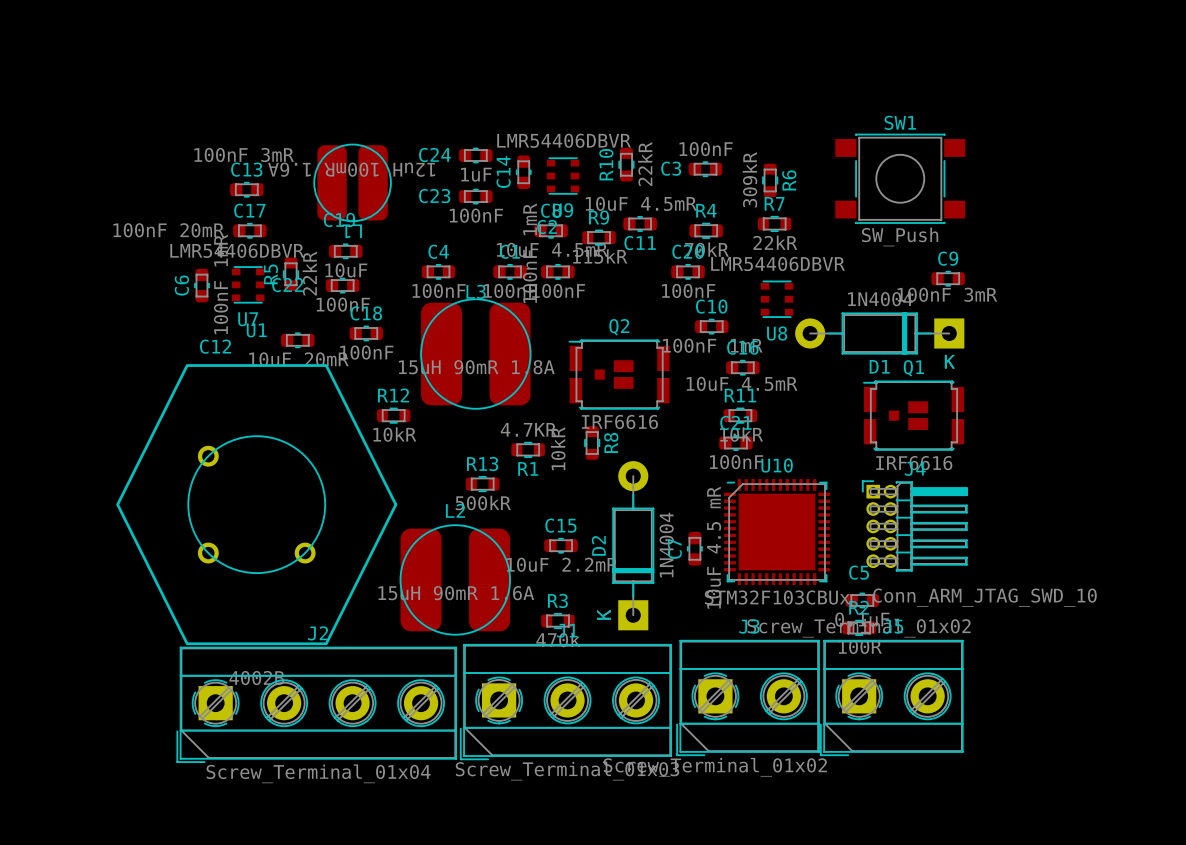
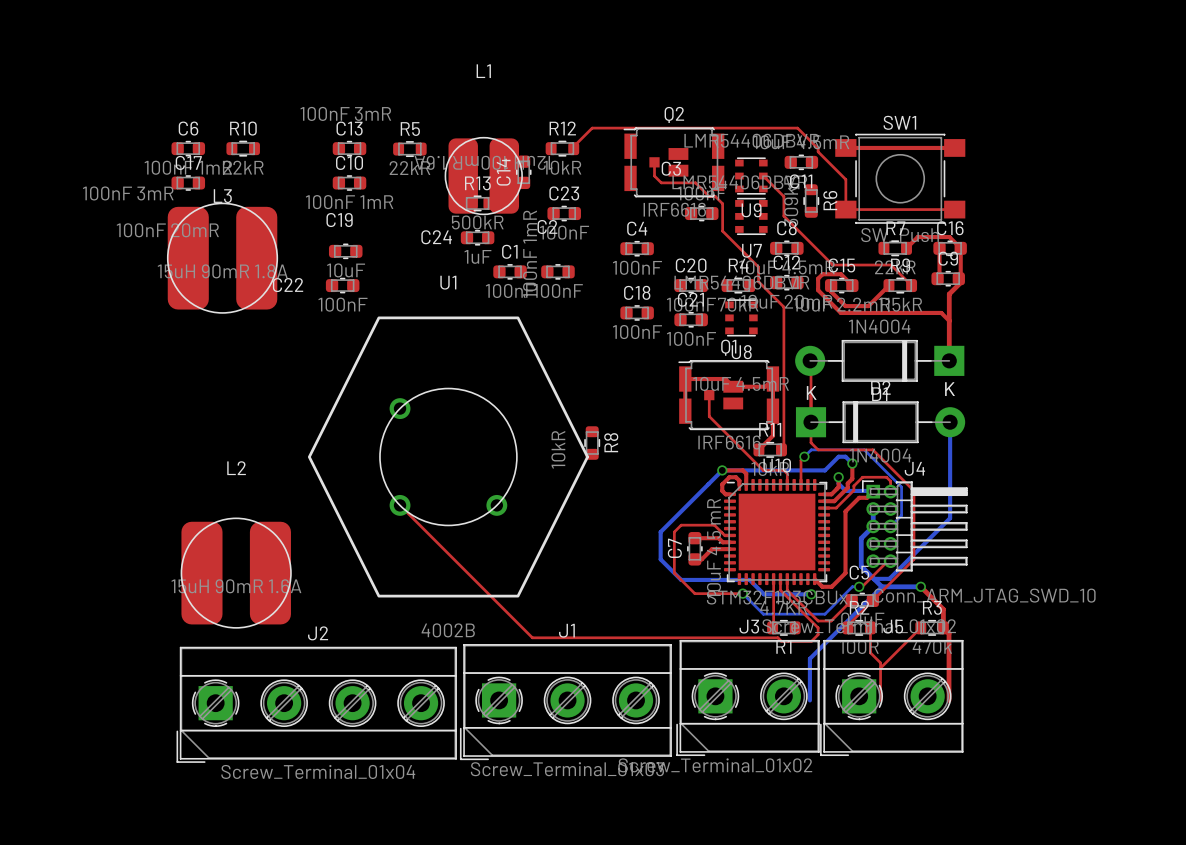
top track: none -> (845, 147) (954, 147)
top track: none -> (573, 148) (592, 128) (797, 128) (845, 179) (845, 209) (954, 209)
C24 position: (475, 155) -> (477, 237)
top track: none -> (654, 162) (654, 176) (661, 182) (695, 182) (709, 196) (715, 196) (722, 203) (722, 231) (758, 267) (758, 281) (783, 307) (783, 447) (781, 449)
R10 rotation: 0° (626, 164) -> 90° clockwise (243, 148)
R10 position: (626, 164) -> (243, 148)
C3 position: (705, 169) -> (701, 213)
U9 position: (563, 176) -> (751, 176)
top track: none -> (763, 176) (783, 196) (783, 216) (832, 265) (891, 265) (911, 285)
R6 position: (770, 180) -> (811, 201)
L1 position: (352, 182) -> (483, 176)
C13 position: (246, 189) -> (349, 148)
C23 name position: C23 (434, 196) -> C23 (564, 193)
C23 position: (475, 196) -> (564, 213)
C11 position: (640, 223) -> (801, 162)
R7 position: (774, 223) -> (895, 248)
C17 position: (249, 230) -> (188, 183)
C8 position: (551, 230) -> (786, 248)
R4 position: (706, 230) -> (738, 285)
L1 name rotation: 0° (352, 231) -> 180° (483, 71)
L1 name position: L1 (352, 231) -> L1 (483, 71)
R9 position: (599, 237) -> (900, 285)
top track: none -> (906, 248) (917, 237) (949, 237) (960, 248) (960, 282) (949, 294) (949, 360)
top track: none -> (939, 248) (939, 282)
C4 position: (438, 271) -> (637, 248)
C20 position: (688, 271) -> (691, 285)
R5 rotation: 0° (290, 274) -> 90° clockwise (409, 149)
R5 position: (290, 274) -> (409, 149)
U7 position: (248, 284) -> (751, 216)
C6 rotation: 0° (201, 285) -> 90° clockwise (188, 148)
C6 position: (201, 285) -> (188, 148)
top track: none -> (831, 285) (831, 291) (845, 306) (868, 306) (888, 285)
top track: none -> (852, 285) (841, 274) (822, 274) (818, 278) (818, 290) (840, 312) (941, 312) (949, 320)
C9 value position: 100nF 3mR (947, 294) -> 100nF 3mR (128, 193)
U8 position: (777, 299) -> (741, 317)
C10 position: (711, 326) -> (349, 183)
C18 position: (366, 333) -> (637, 312)
D1 position: (879, 333) -> (879, 360)
C12 position: (297, 340) -> (786, 282)
C12 name position: C12 (215, 346) -> C12 (786, 262)
L3 position: (475, 354) -> (222, 258)
top track: none -> (810, 360) (811, 442) (818, 449) (872, 449) (913, 490) (913, 559) (847, 625) (847, 627)
C16 position: (742, 367) -> (950, 248)
Q2 position: (619, 374) -> (673, 162)
top track: none -> (709, 395) (709, 416) (763, 470) (783, 470) (787, 473) (787, 484)
top track: none -> (685, 411) (685, 379) (725, 379) (733, 386) (765, 386) (772, 379) (772, 435) (758, 449)
R12 position: (393, 415) -> (562, 148)
R11 position: (740, 415) -> (770, 449)
Q1 position: (913, 415) -> (728, 395)
bottom track: none -> (950, 422) (950, 518) (889, 578) (873, 578)
C21 position: (735, 443) -> (691, 319)
R1 position: (528, 449) -> (783, 627)
top track: none -> (804, 456) (801, 460) (801, 484)
bottom track: none -> (804, 456) (811, 449) (864, 449) (901, 487) (901, 515) (890, 526)
via: none -> (804, 456)
top track: none -> (852, 463) (852, 478) (847, 483) (847, 487) (834, 501) (824, 501)
bottom track: none -> (852, 463) (845, 456) (838, 456) (824, 470) (722, 470) (660, 532) (660, 559) (681, 579) (749, 579) (764, 594) (811, 594)
via: none -> (852, 463)
top track: none -> (722, 470) (742, 470) (746, 473) (746, 484)
via: none -> (722, 470)
top track: none -> (838, 477) (838, 487) (831, 494) (824, 494)
bottom track: none -> (838, 477) (838, 483) (845, 490) (873, 491)
via: none -> (838, 477)
R13 position: (482, 484) -> (477, 203)
top track: none -> (739, 484) (739, 480) (735, 477) (729, 477) (722, 484) (722, 490) (725, 494) (729, 494)
top track: none -> (873, 491) (867, 497) (859, 497) (845, 511) (845, 573) (831, 586) (822, 586) (814, 579)
top track: none -> (890, 491) (890, 481) (886, 477) (862, 477) (853, 485) (853, 490) (836, 508) (824, 508)
U1 position: (256, 504) -> (448, 456)
top track: none -> (400, 505) (532, 637) (777, 637) (781, 641) (811, 641) (818, 634) (818, 627) (780, 590) (780, 579)
bottom track: none -> (873, 509) (873, 526) (861, 538) (861, 566) (881, 586)
L2 name position: L2 (455, 510) -> L2 (236, 468)
top track: none -> (729, 535) (724, 535) (714, 525) (681, 525) (674, 532) (674, 573) (694, 593) (742, 593)
top track: none -> (694, 538) (718, 538) (722, 542) (729, 542)
C15 position: (561, 545) -> (841, 285)
D2 rotation: 0° (633, 545) -> 90° clockwise (880, 422)
D2 position: (633, 545) -> (880, 422)
top track: none -> (729, 549) (712, 549) (701, 559) (694, 559)
top track: none -> (890, 561) (887, 561) (862, 586) (859, 586)
L2 position: (455, 579) -> (236, 573)
top track: none -> (773, 579) (772, 627)
top track: none -> (787, 579) (787, 590) (818, 621) (831, 621) (851, 600)
bottom track: none -> (859, 586) (852, 586) (824, 614) (763, 614) (742, 593)
via: none -> (859, 586)
bottom track: none -> (881, 586) (809, 658) (809, 700)
bottom track: none -> (881, 586) (920, 586)
top track: none -> (920, 586) (943, 609) (943, 627) (949, 633) (949, 700)
via: none -> (920, 586)
via: none -> (742, 593)
via: none -> (811, 594)
R3 position: (557, 621) -> (932, 627)
top track: none -> (870, 627) (870, 652) (880, 662) (880, 700)
top track: none -> (920, 627) (880, 668)

